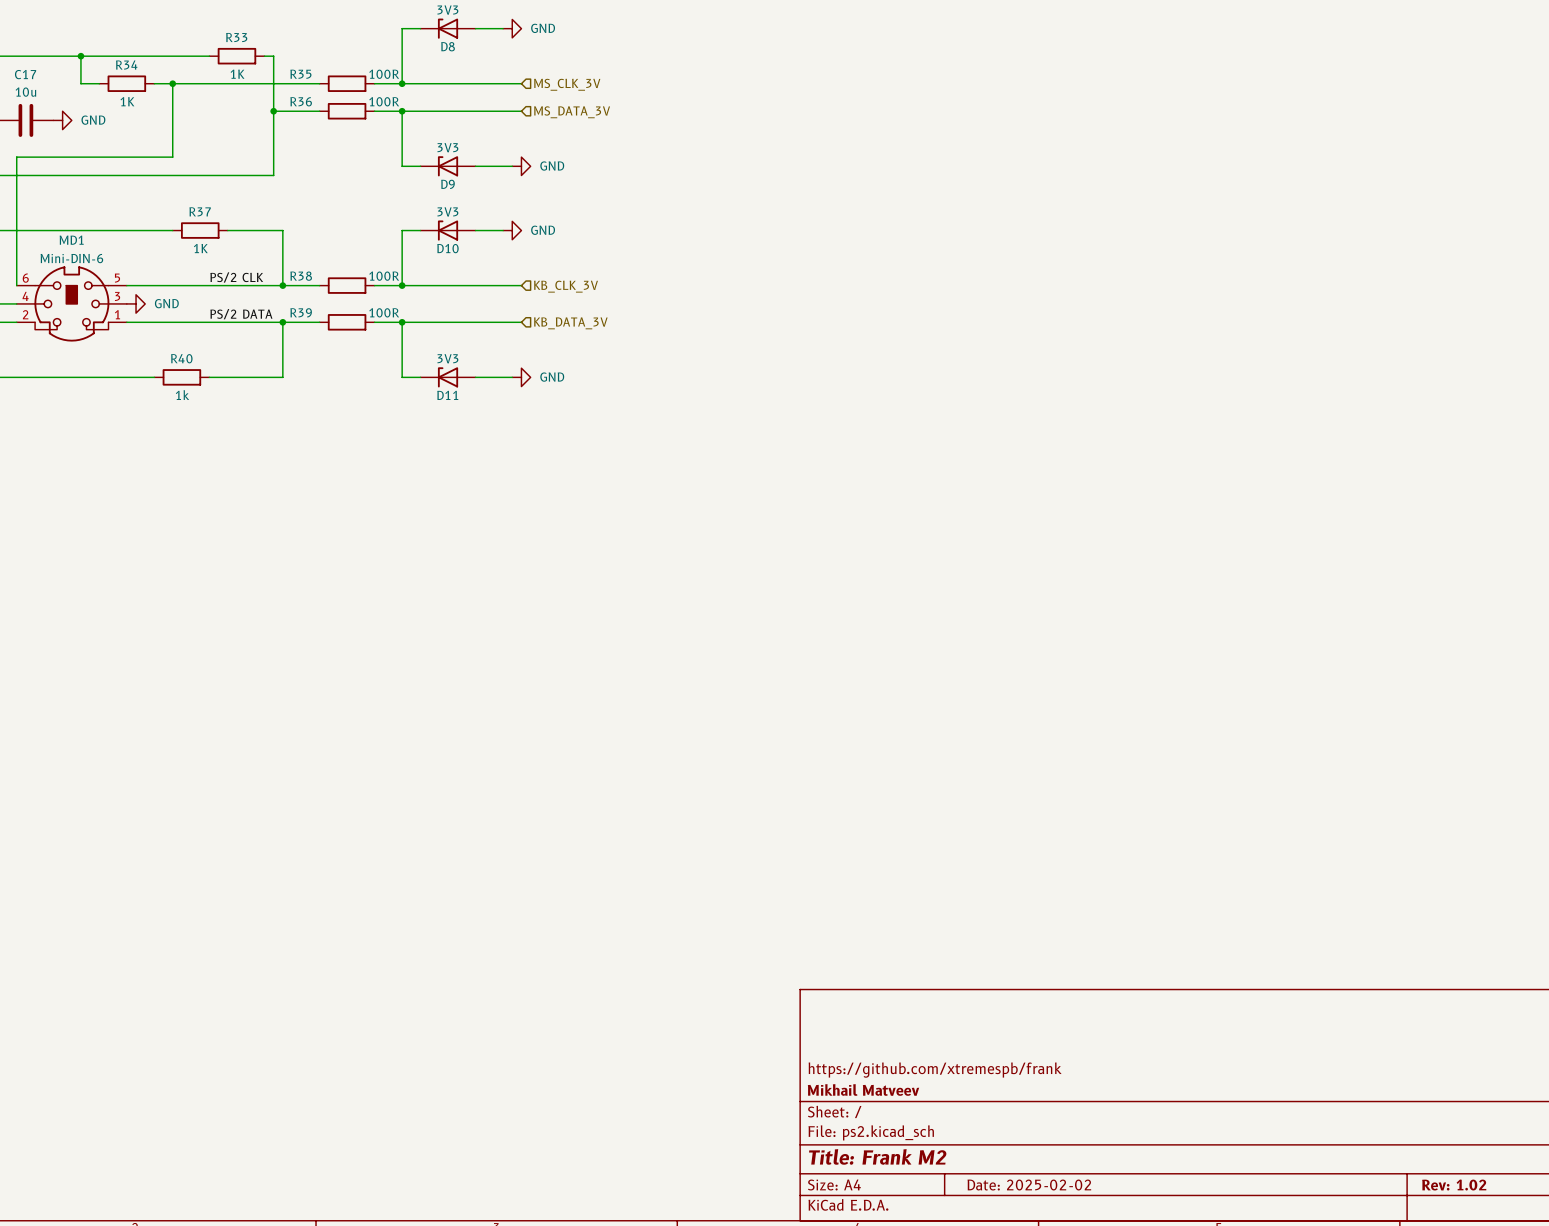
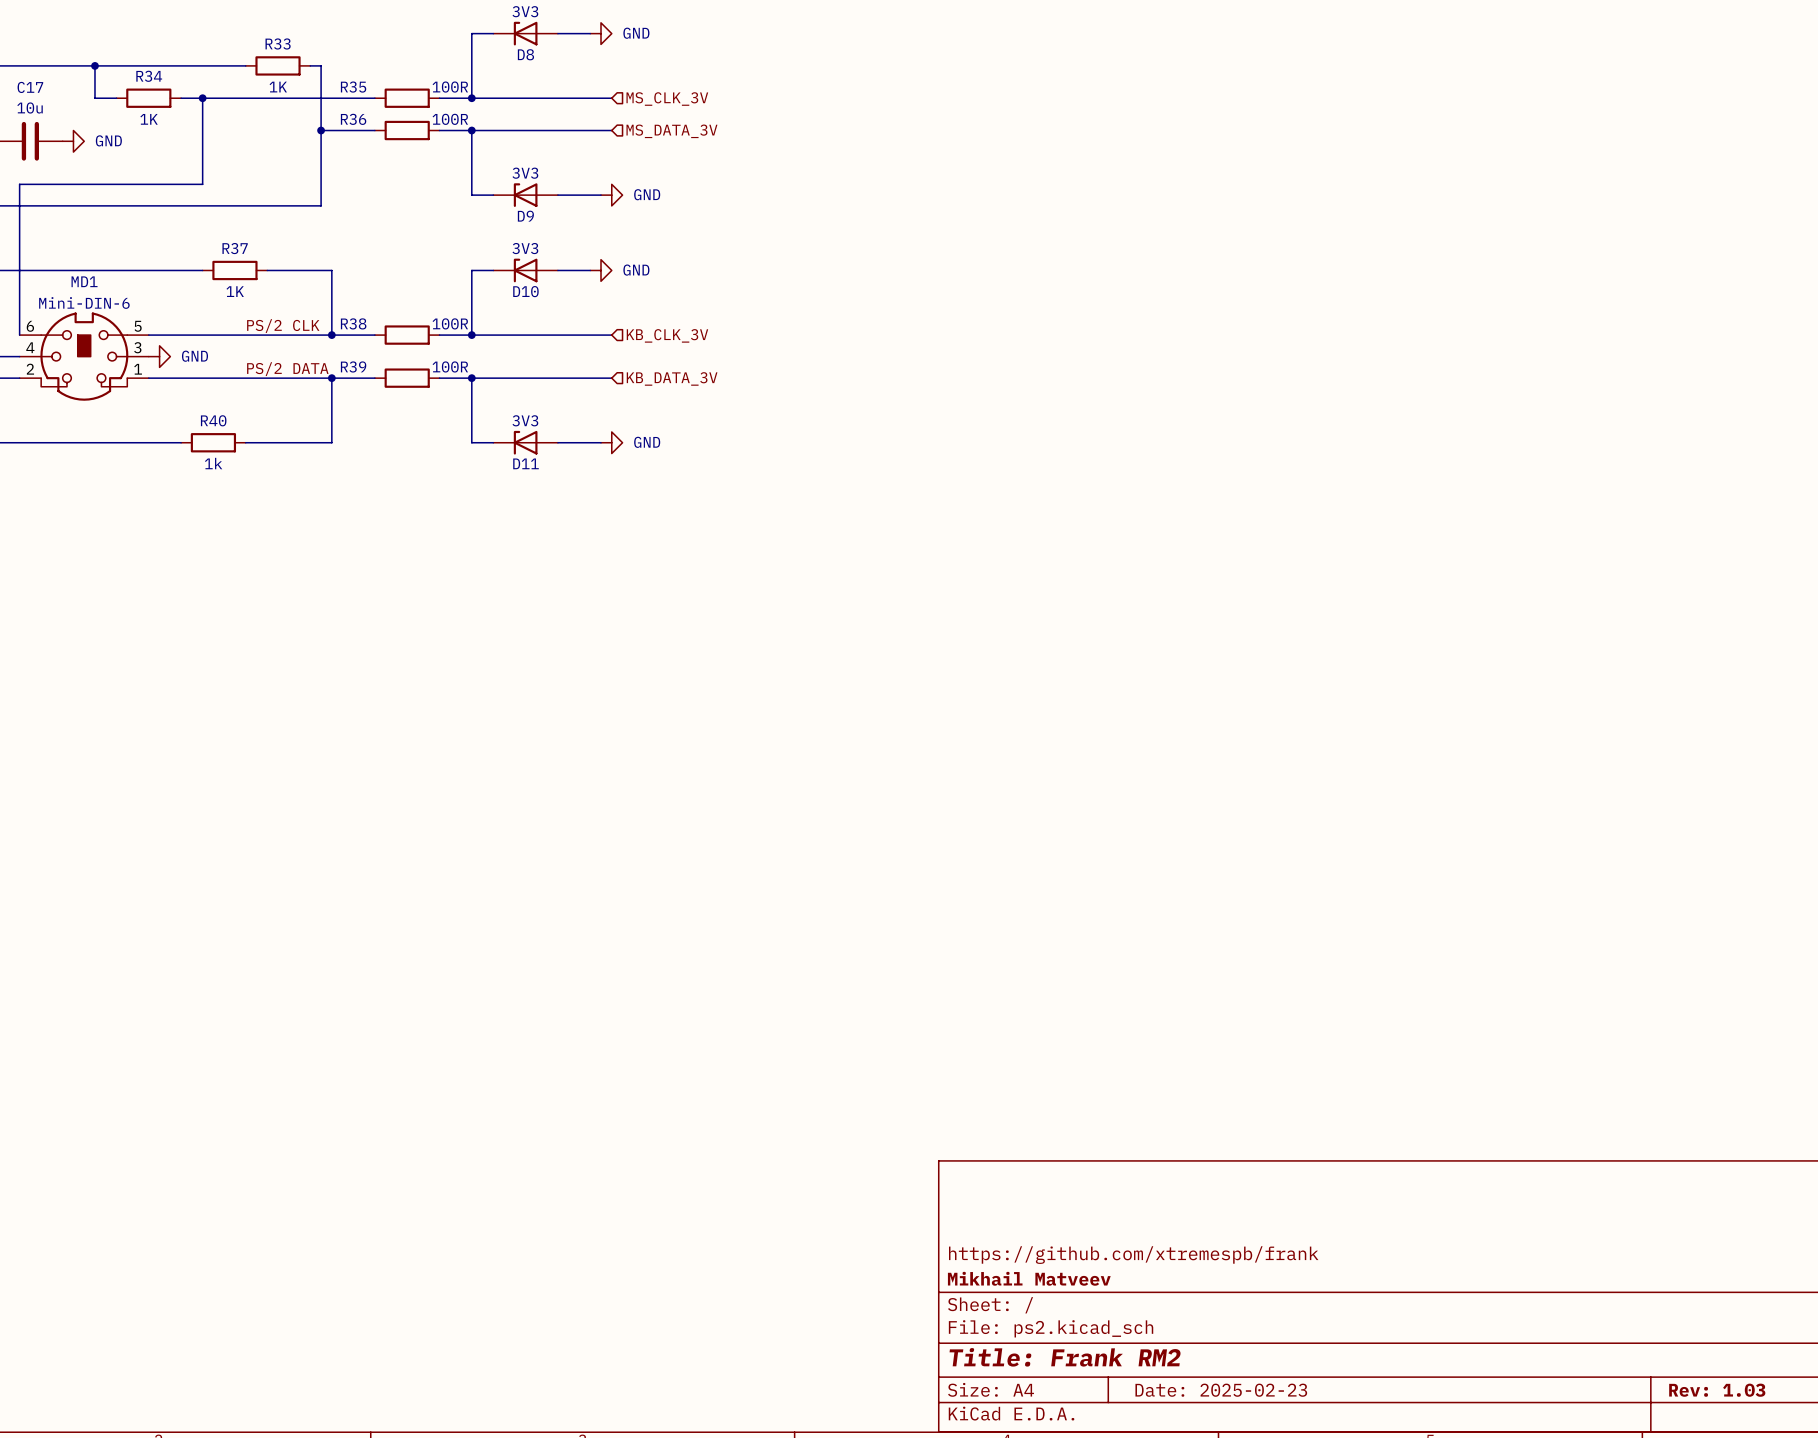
title block: Title: Frank M2 (877, 1156) -> Title: Frank RM2 (1065, 1357)
title block: Date: 2025-02-02 (1029, 1185) -> Date: 2025-02-23 (1221, 1390)
title block: Rev: 1.02 (1454, 1185) -> Rev: 1.03 (1717, 1390)

